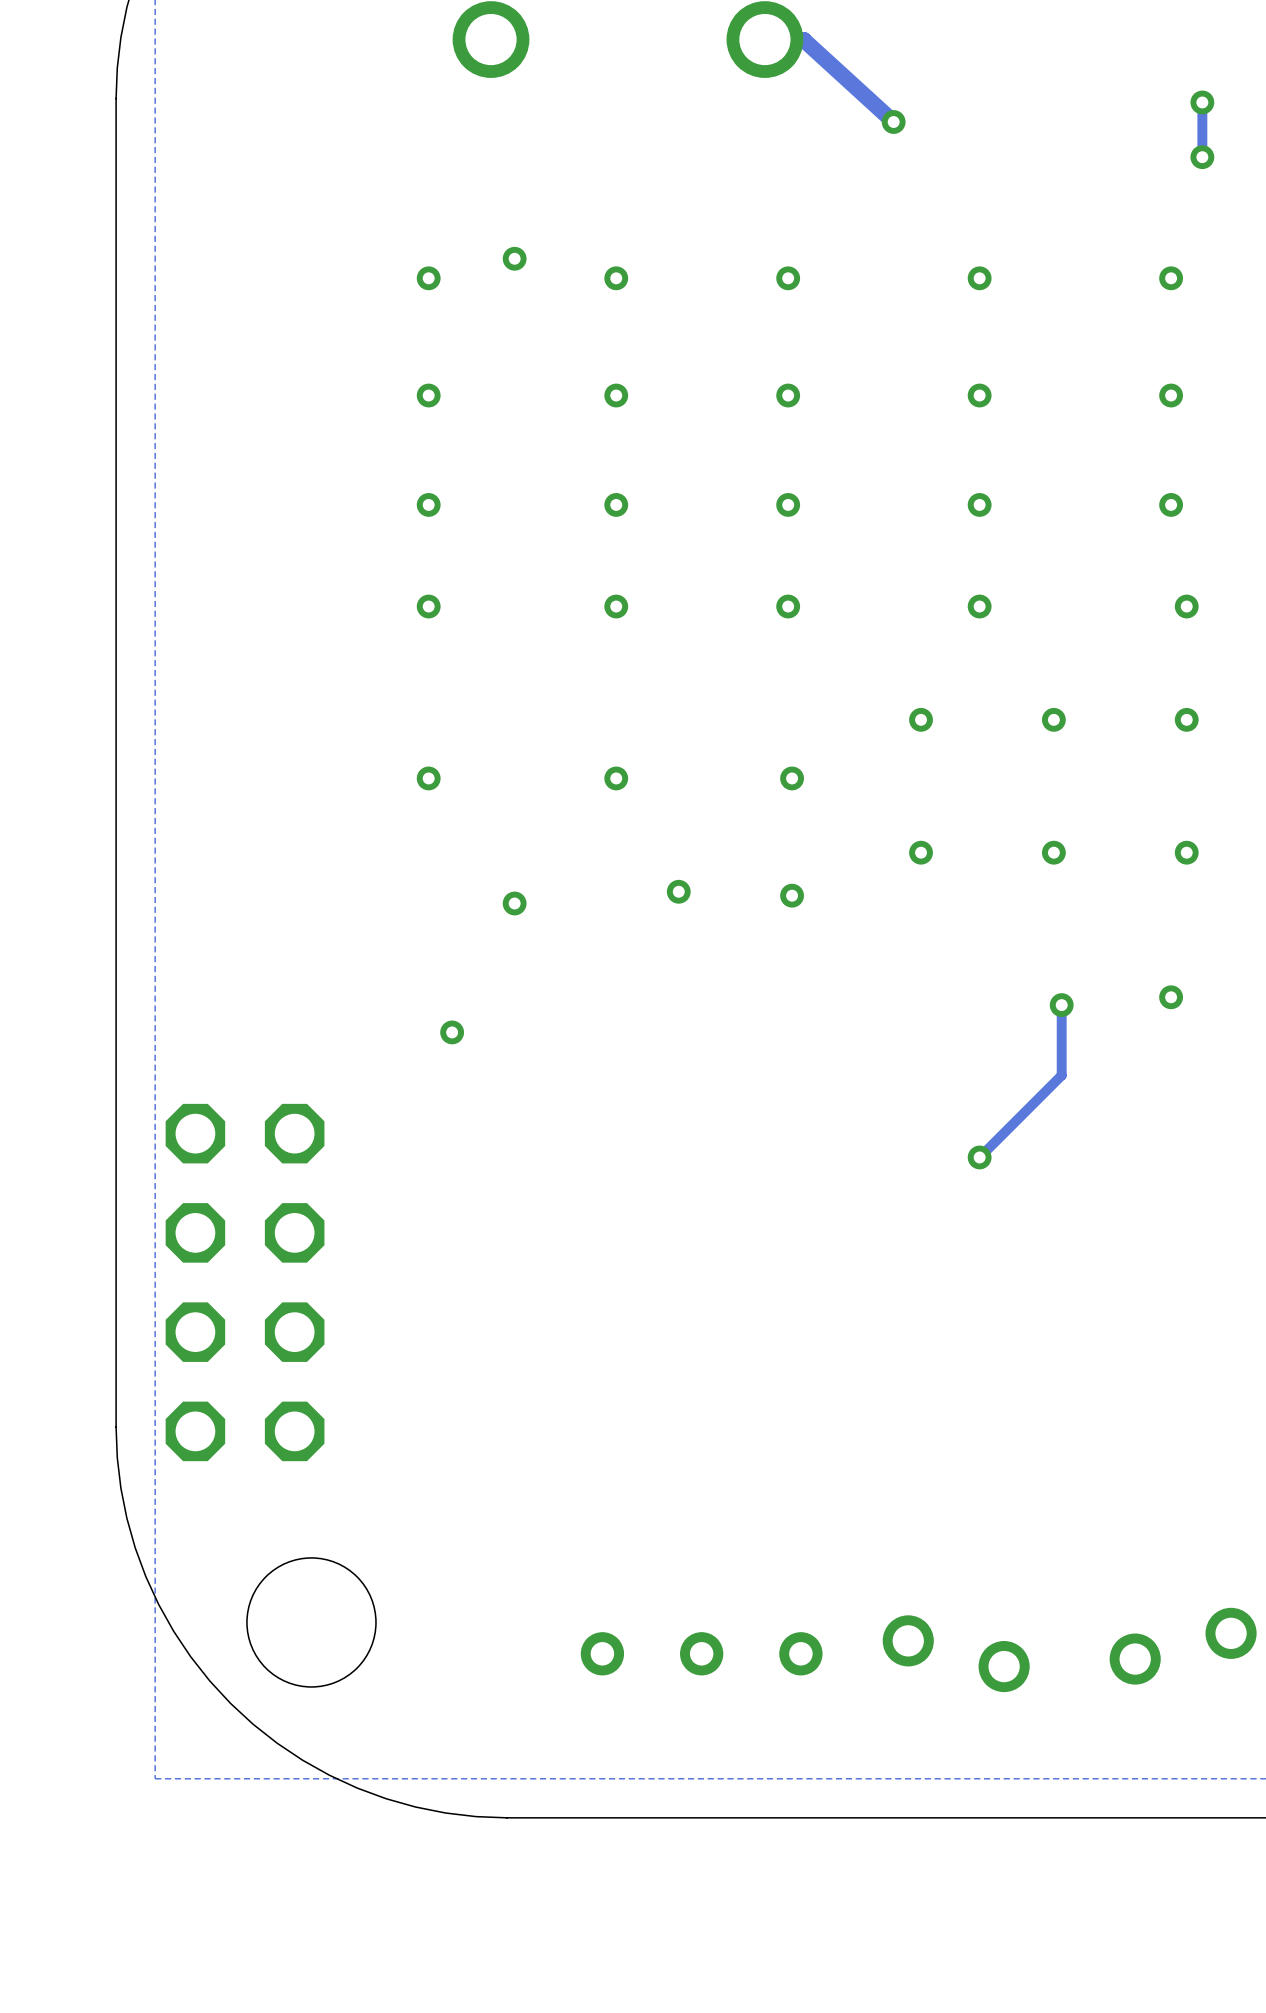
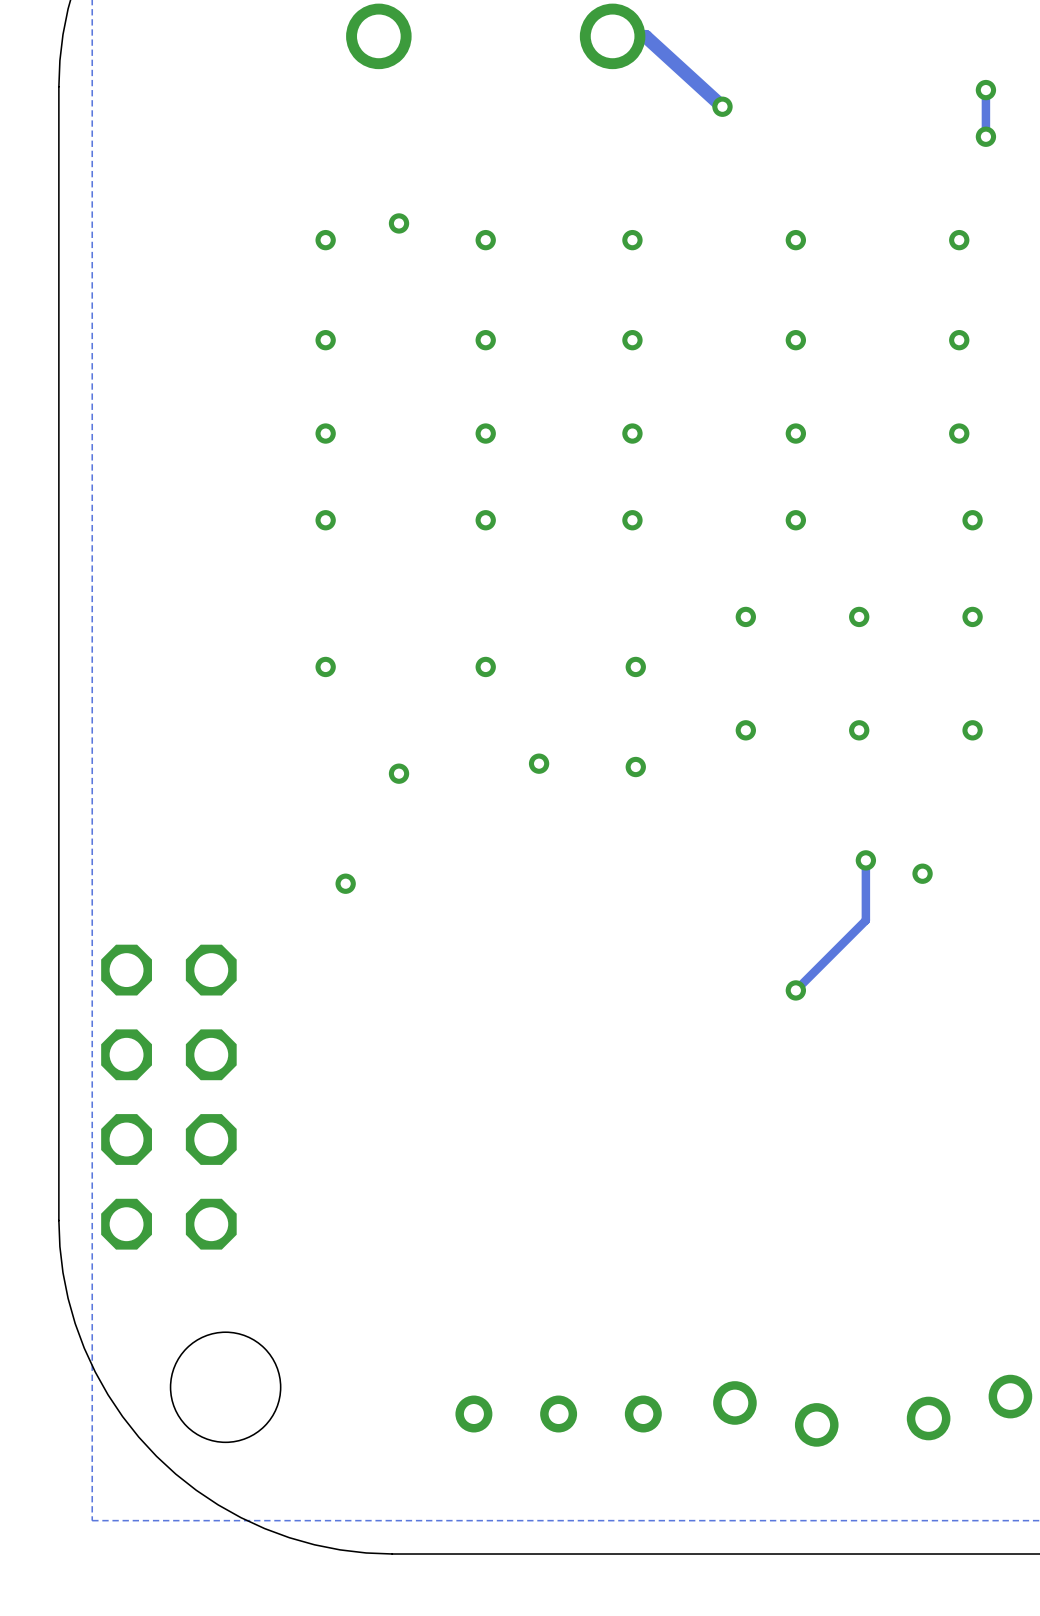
via position: (1171, 997) -> (922, 873)

